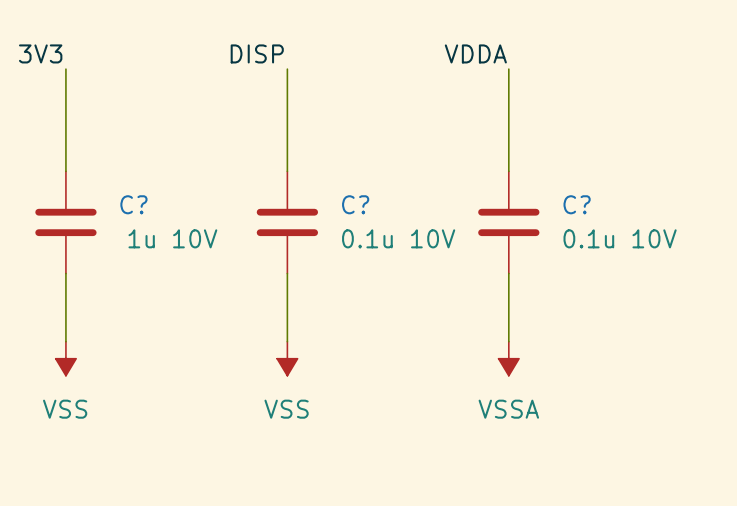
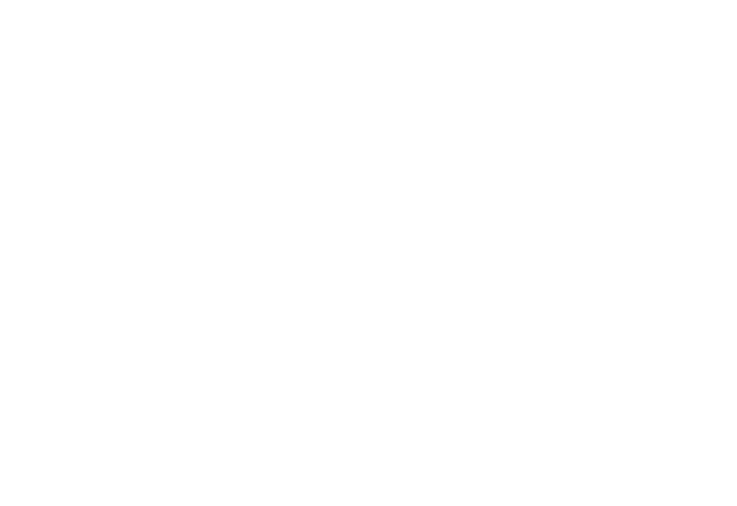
label: 3V3 (40, 53) -> none
label: DISP (257, 53) -> none
label: VDDA (475, 53) -> none
wire: (65, 69) (65, 171) -> none
wire: (287, 69) (287, 171) -> none
wire: (508, 69) (508, 171) -> none
C?: 1u 10V (65, 222) -> none
C?: 0.1u 10V (287, 222) -> none
C?: 0.1u 10V (508, 222) -> none
wire: (65, 273) (65, 341) -> none
wire: (287, 273) (287, 341) -> none
wire: (508, 273) (508, 341) -> none
power symbol: VSS (65, 358) -> none
power symbol: VSS (287, 358) -> none
power symbol: VSSA (508, 358) -> none

